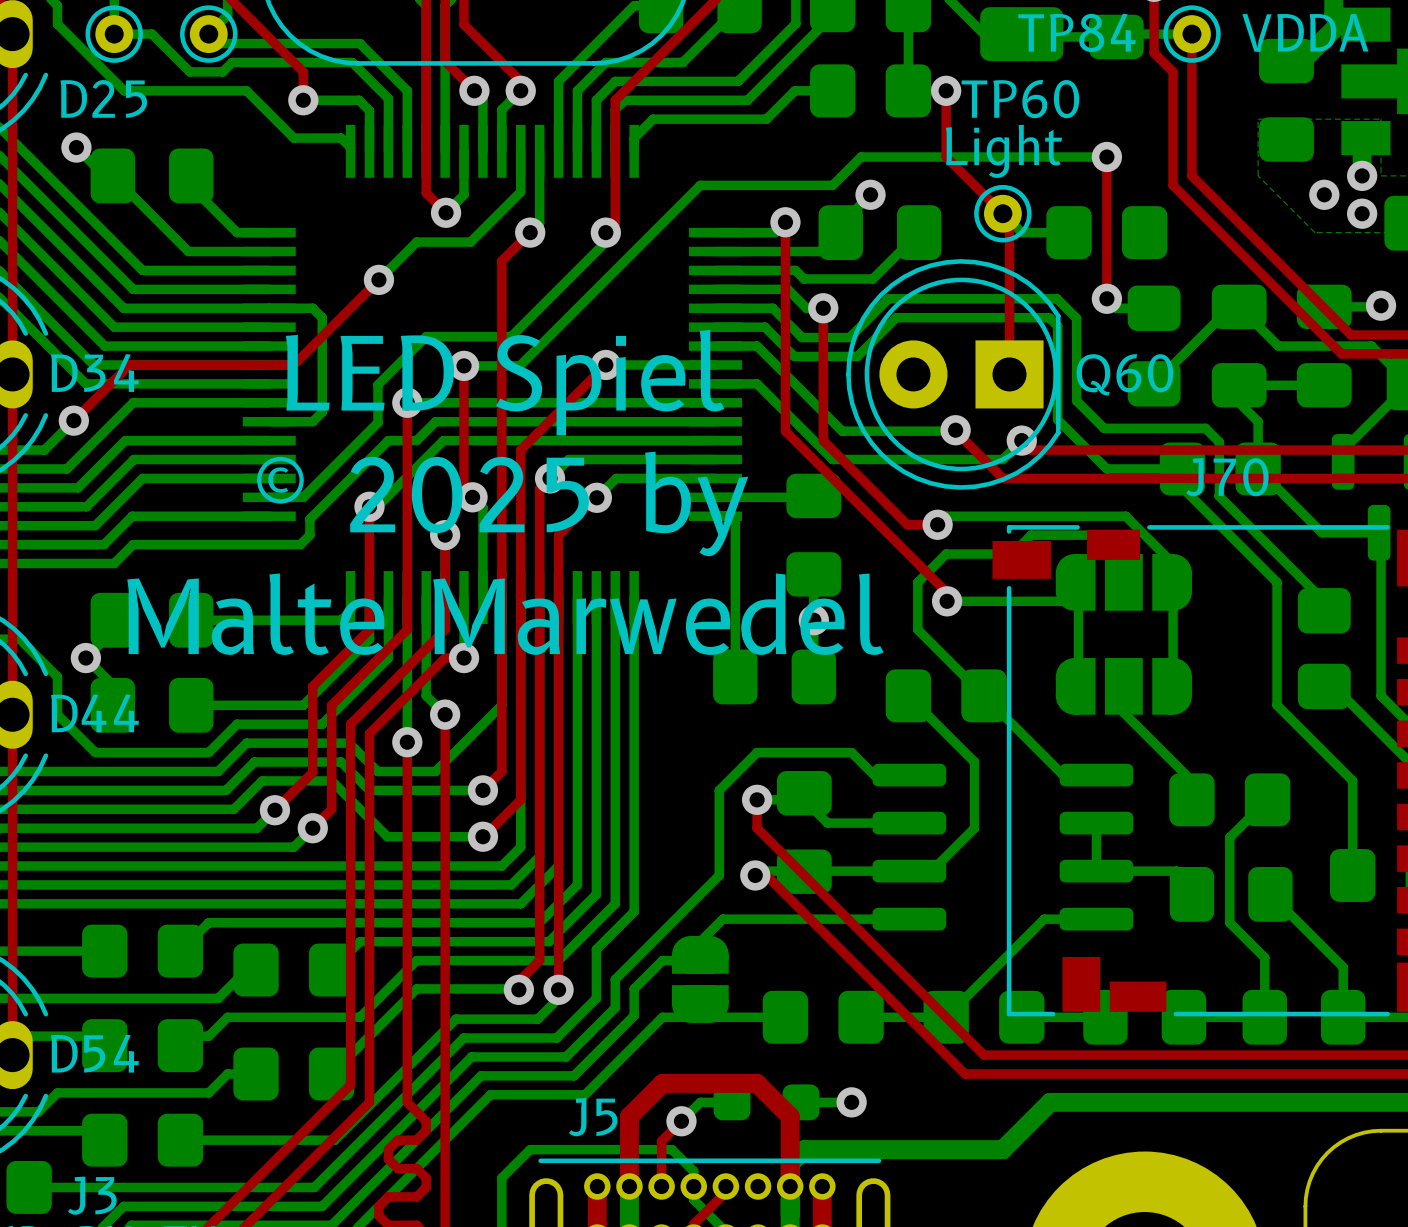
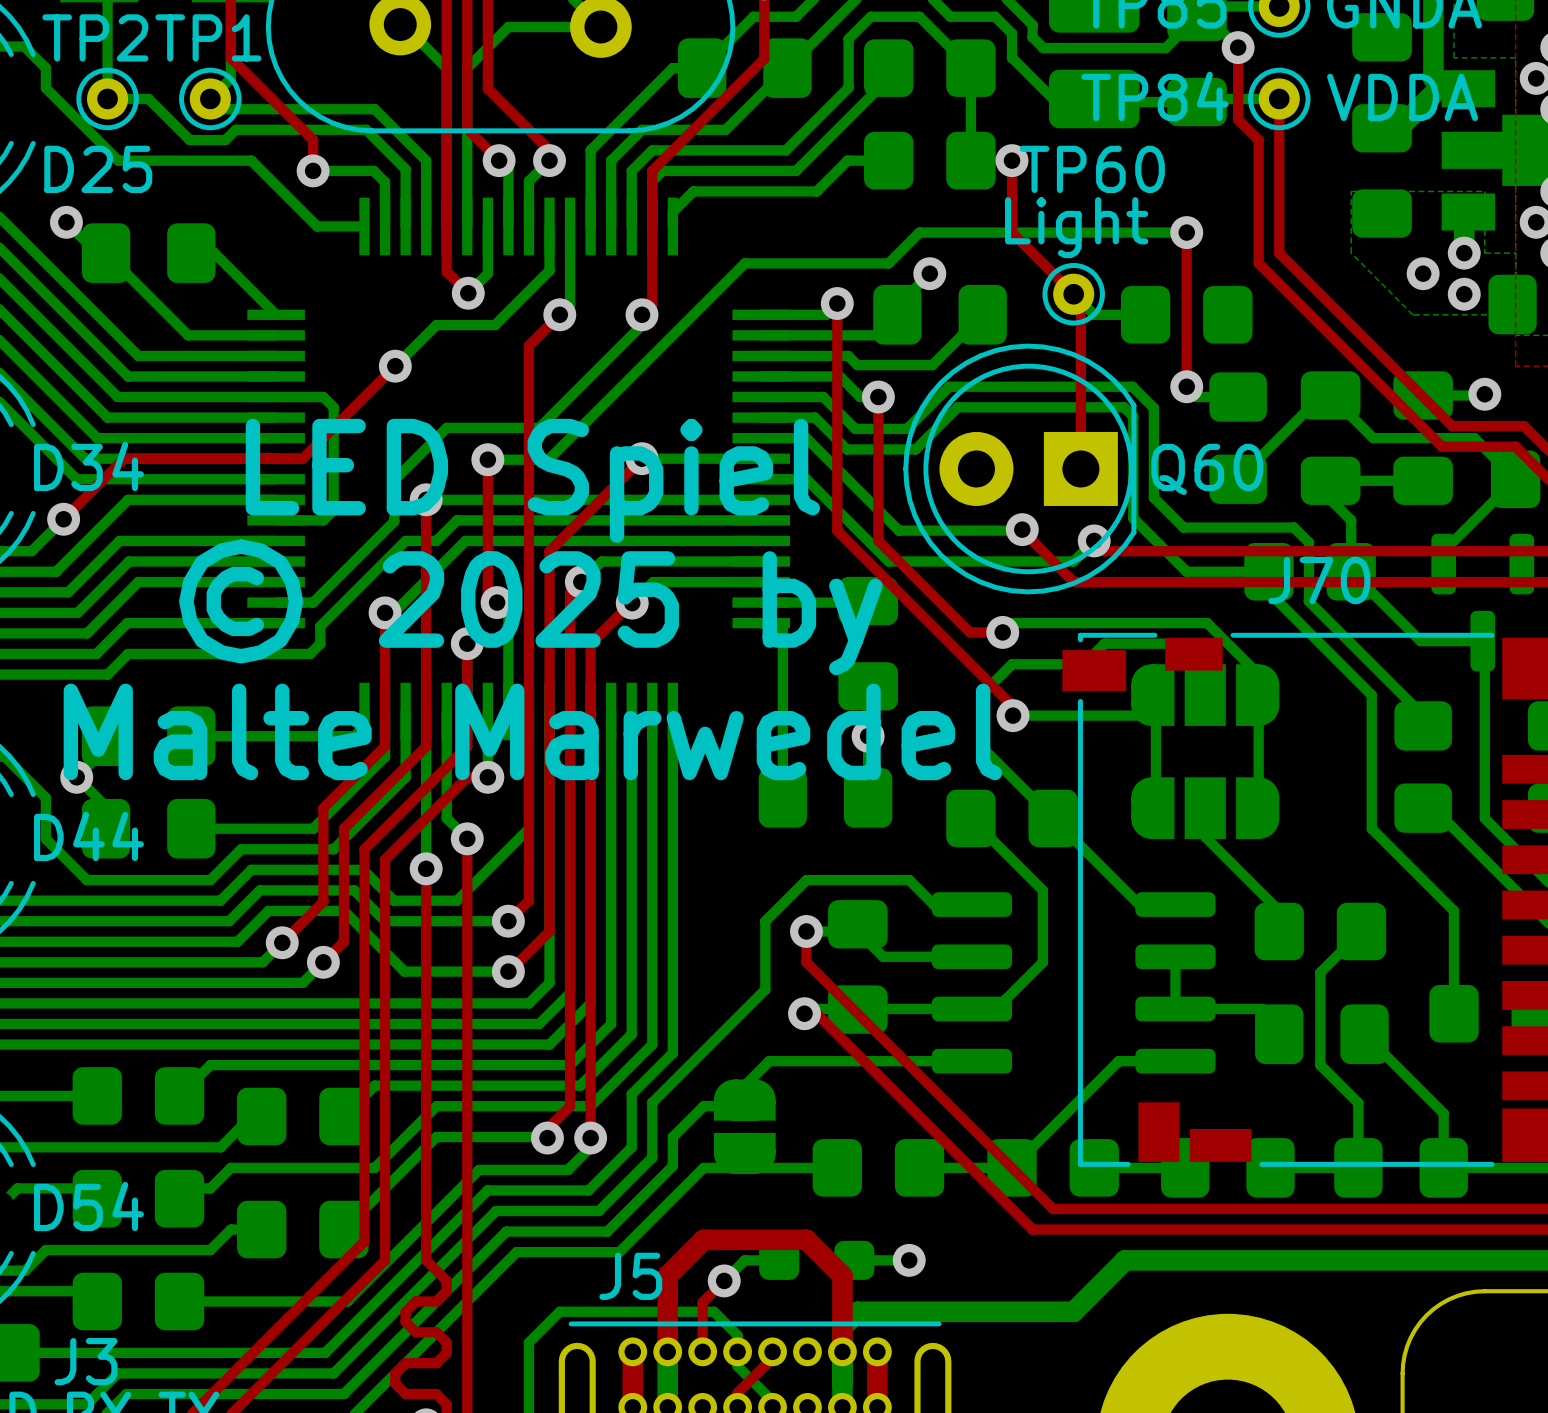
bottom track: (293, 138) (341, 138) (350, 147) (350, 151) -> (302, 212) (317, 226) (364, 226)
bottom track: (191, 175) (191, 186) (237, 232) (269, 232) -> (191, 253) (214, 253) (276, 314)
bottom track: (719, 853) (719, 875) (615, 979) -> (765, 989) (652, 1102) (652, 1126)

